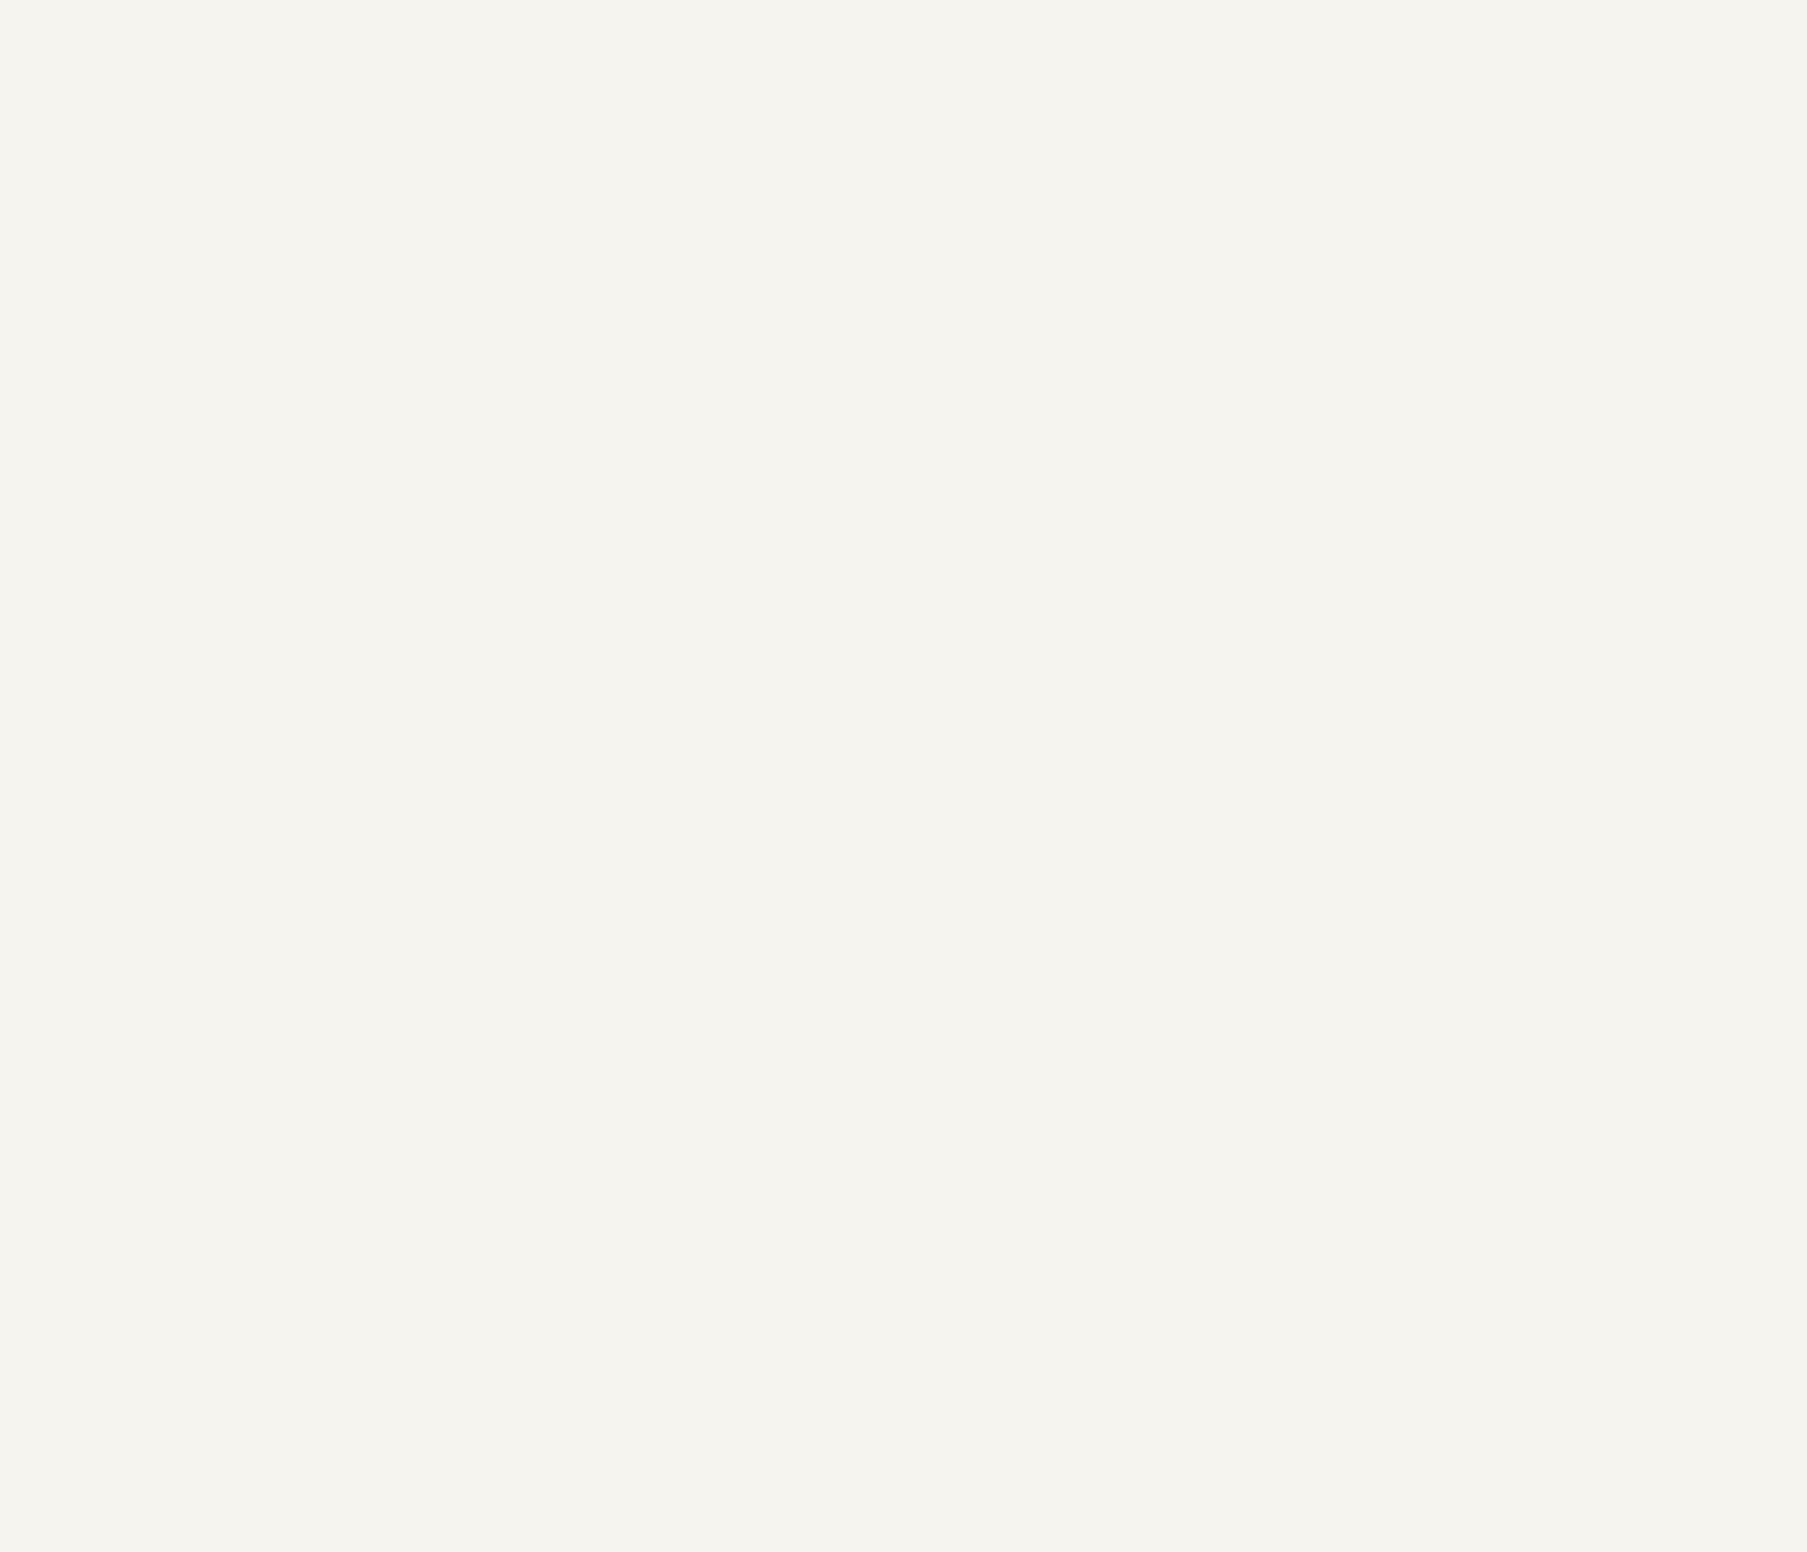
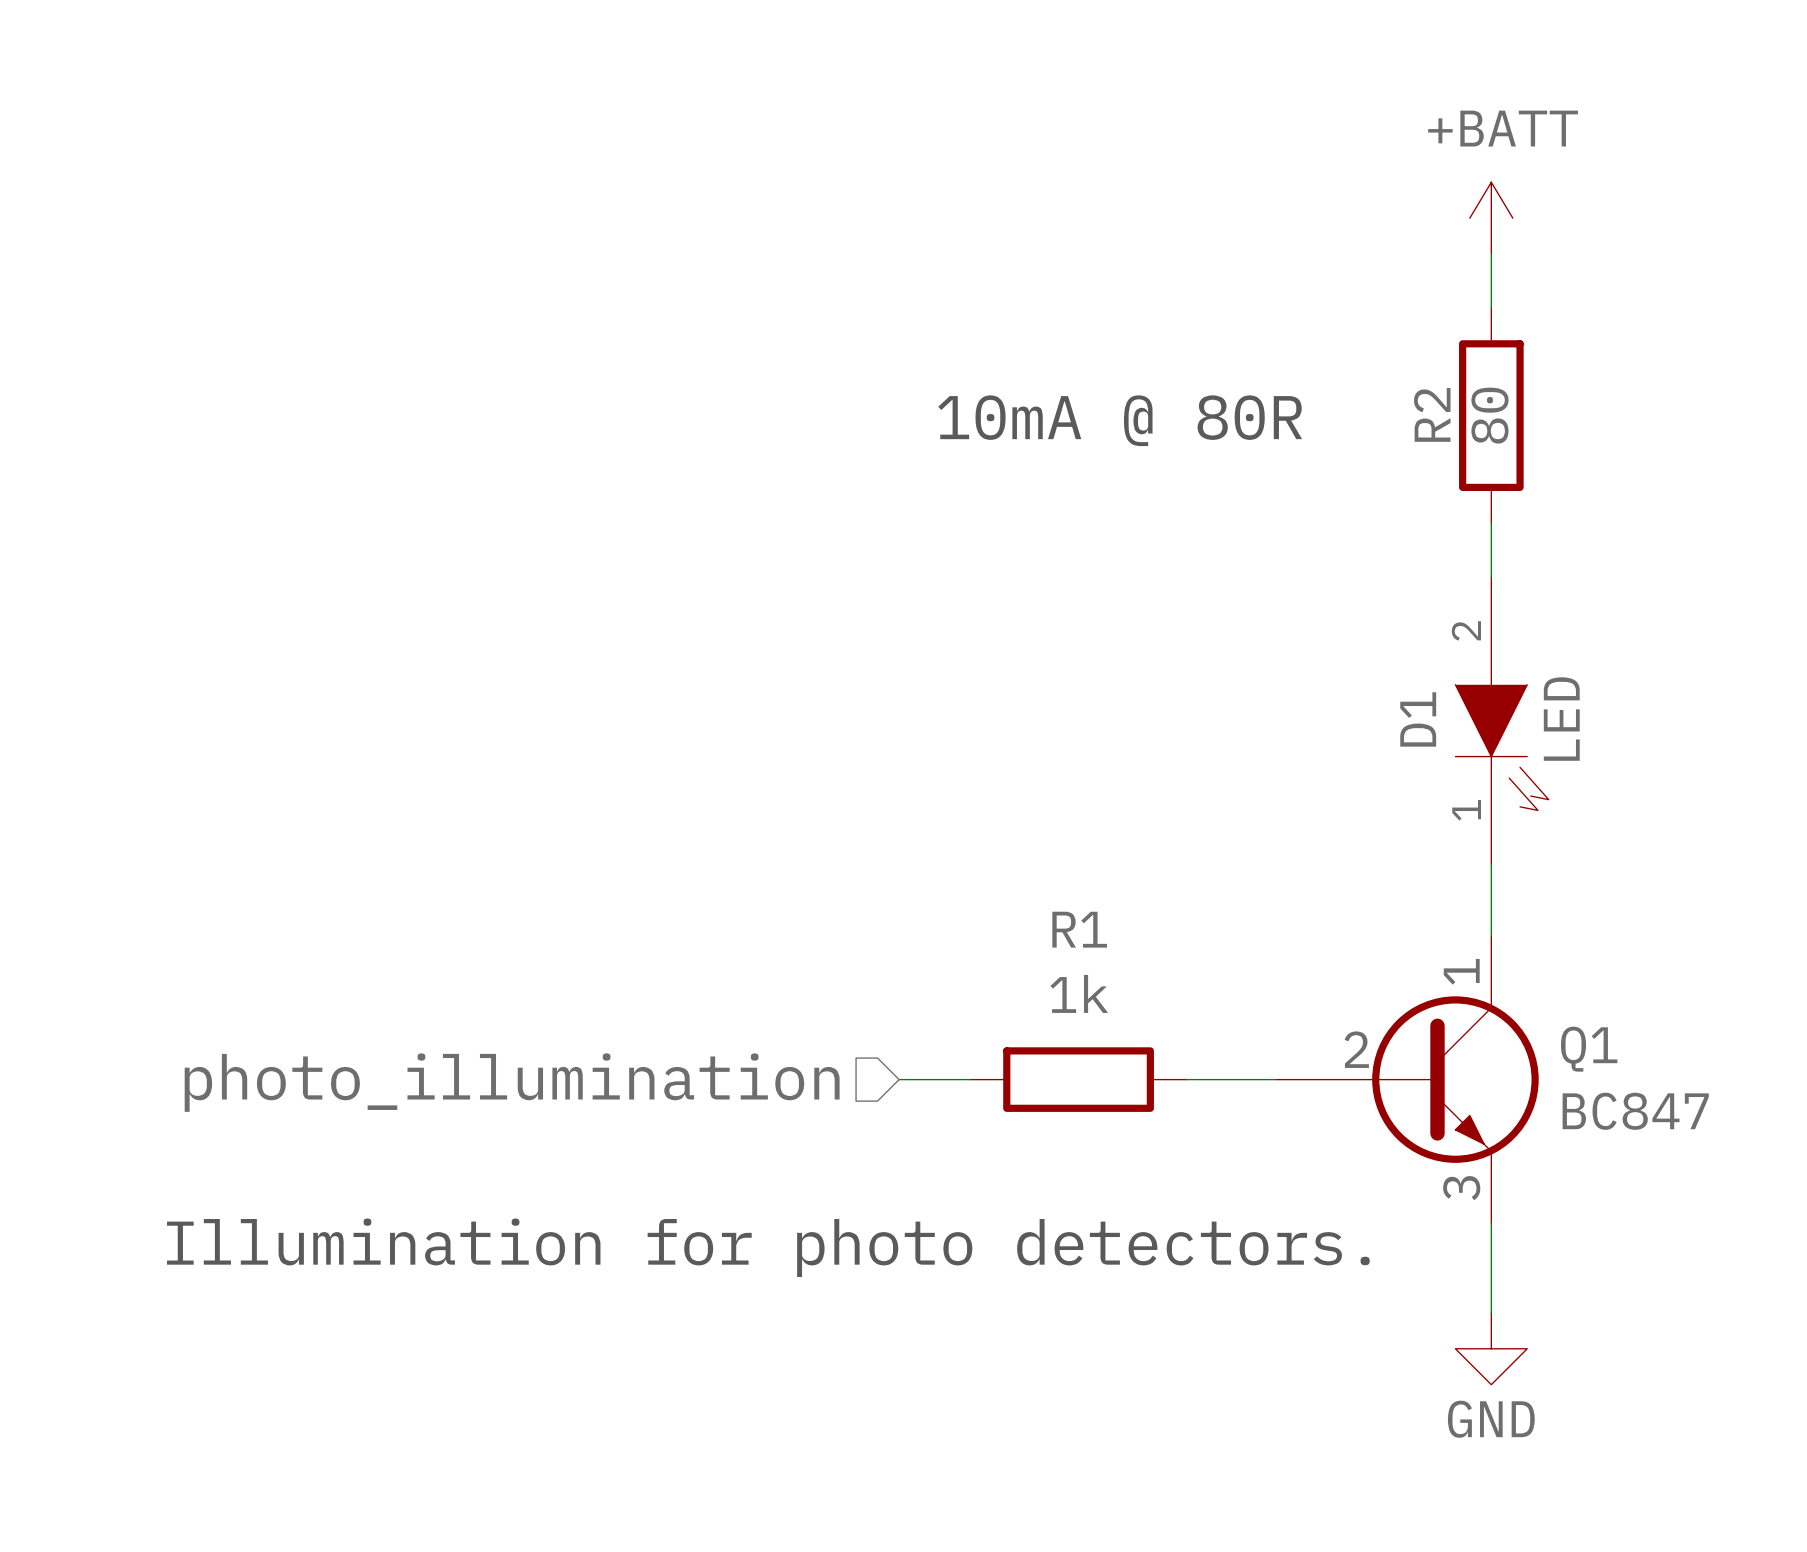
power symbol: none -> +BATT (1491, 218)
wire: none -> (1491, 254) (1491, 307)
R2: none -> 80 (1491, 415)
text: none -> 10mA @ 80R (1120, 420)
wire: none -> (1491, 523) (1491, 577)
D1: none -> LED (1502, 720)
wire: none -> (1491, 864) (1491, 936)
wire: none -> (899, 1079) (970, 1079)
R1: none -> 1k (1078, 1079)
wire: none -> (1186, 1079) (1275, 1079)
Q1: none -> BC847 (1407, 1079)
hierarchical label: none -> photo_illumination (512, 1082)
wire: none -> (1491, 1223) (1491, 1312)
text: none -> Illumination for photo detectors. (768, 1247)
power symbol: none -> GND (1491, 1348)

